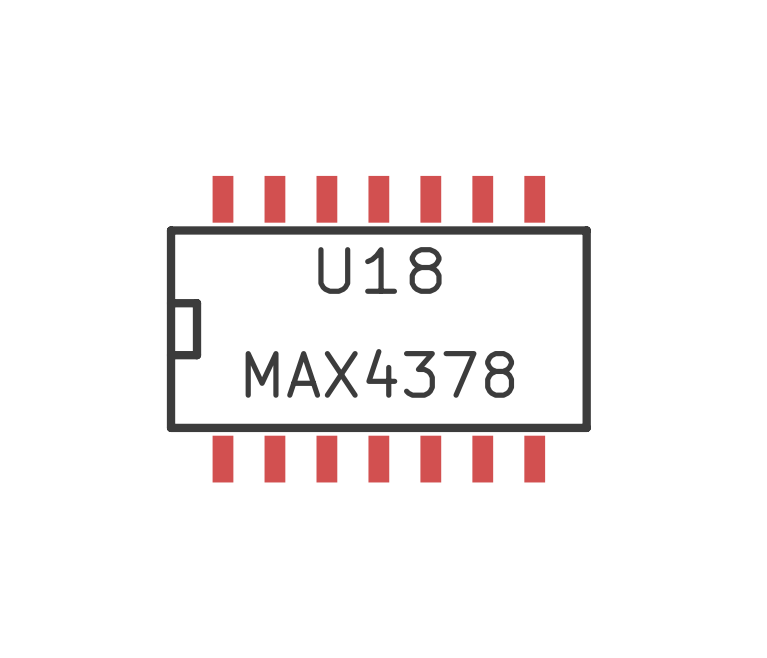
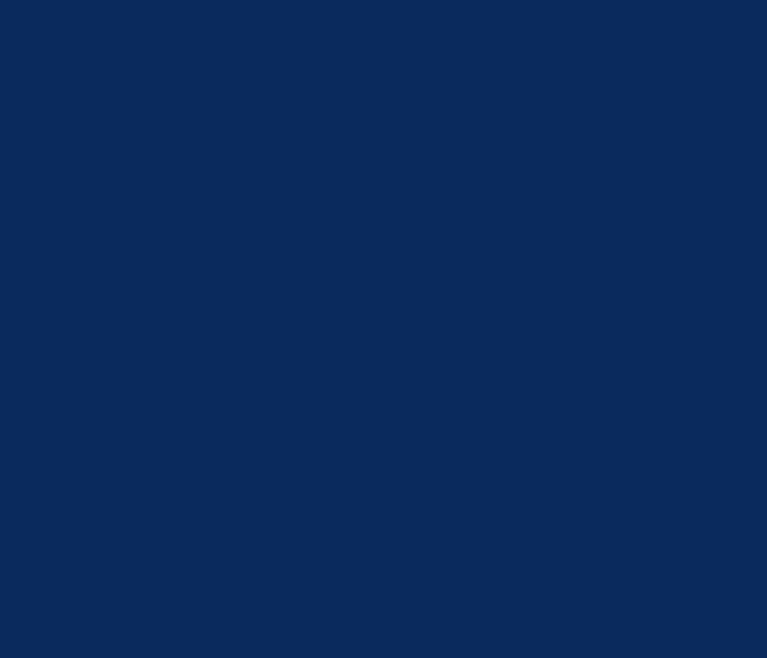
U18: MAX4378 (378, 329) -> none

